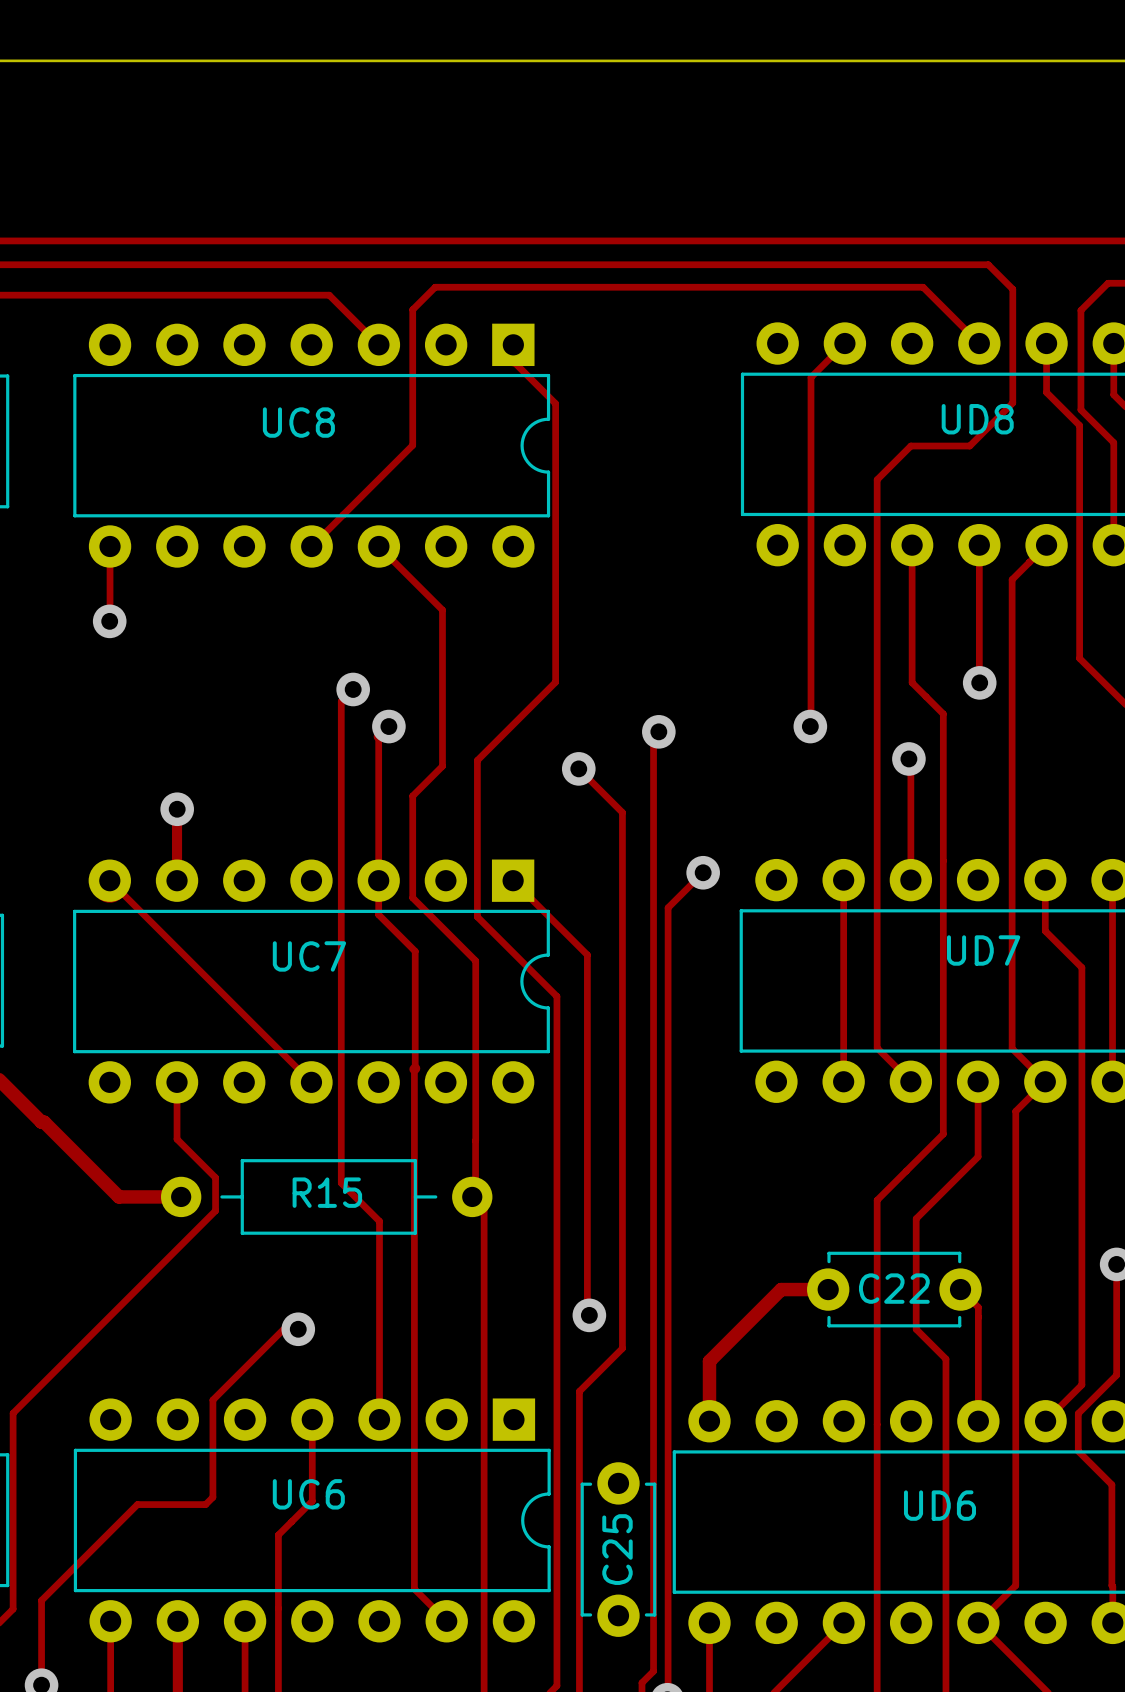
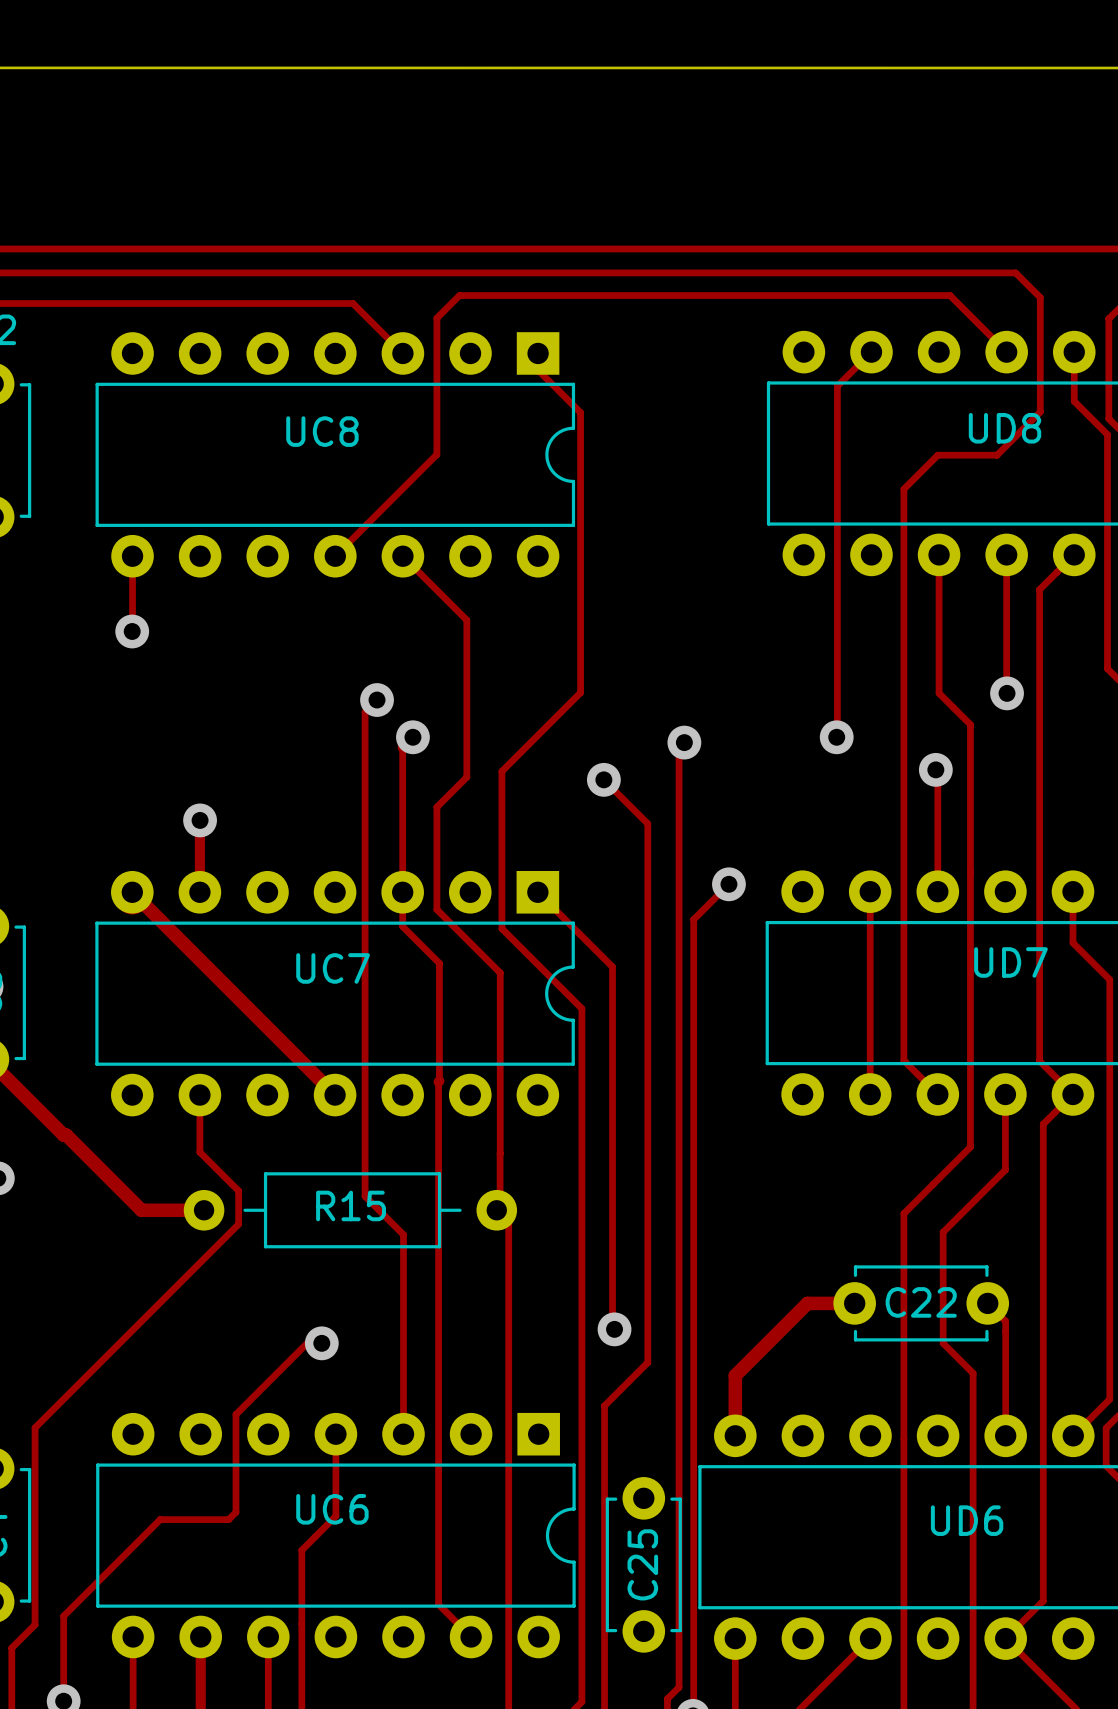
track width: thin (109, 880) (311, 1082) -> thick (132, 892) (335, 1095)

